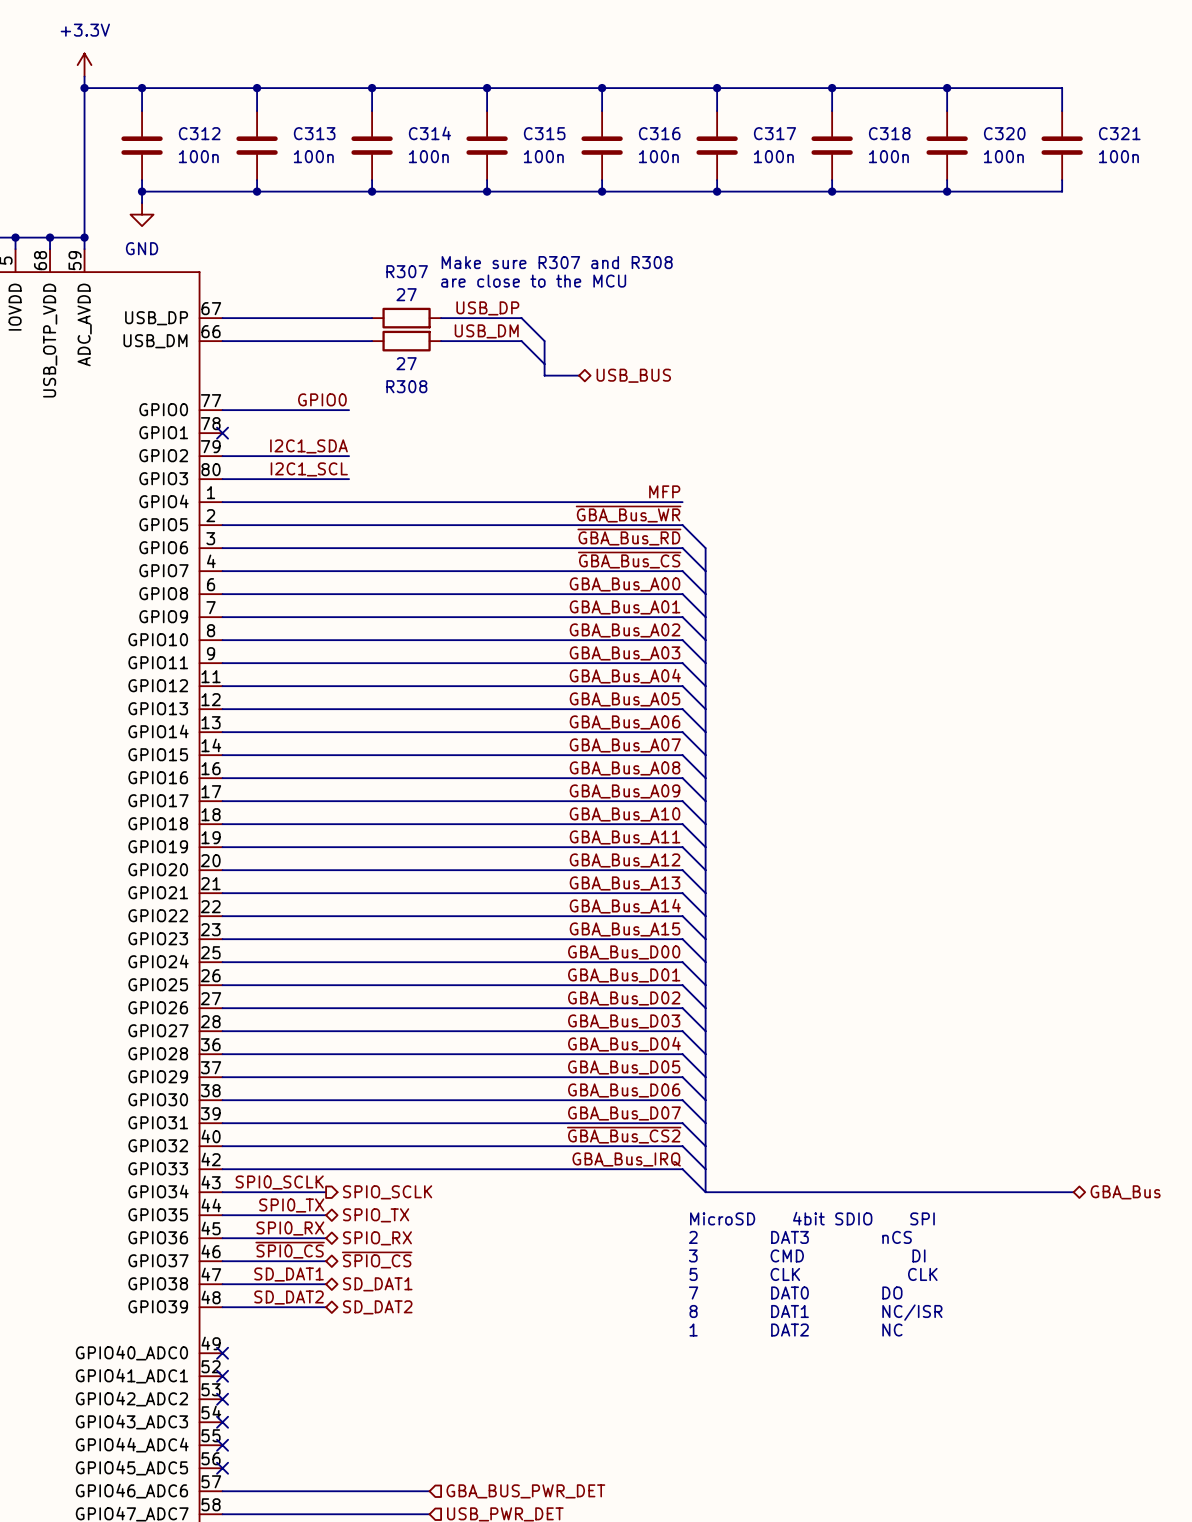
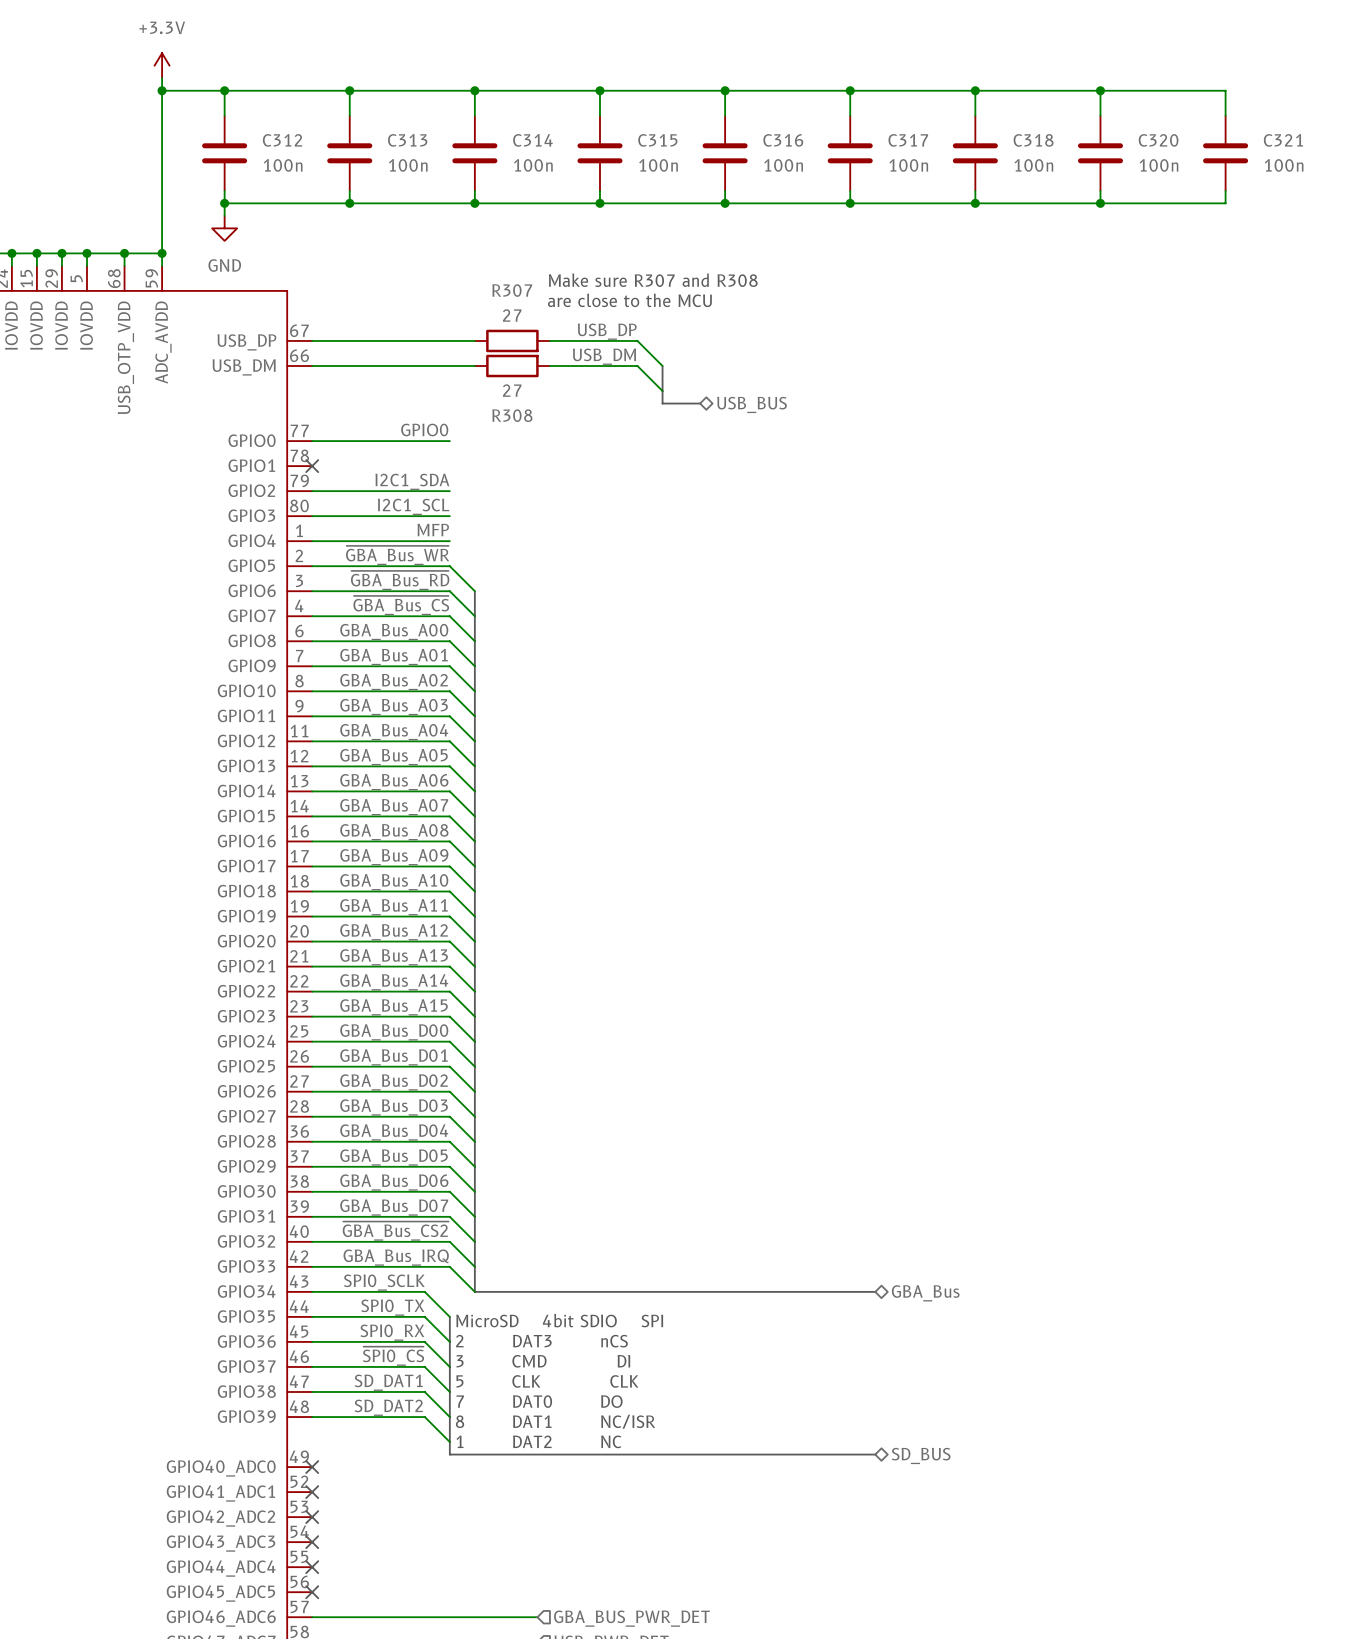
label: none -> MFP (433, 530)
label: MFP (664, 491) -> none
wire: (349, 502) (682, 502) -> none
label: none -> ~{GBA_Bus_WR} (397, 555)
label: ~{GBA_Bus_WR} (628, 514) -> none
wire: (349, 525) (682, 525) (705, 548) -> (449, 566) (474, 591)
label: none -> ~{GBA_Bus_RD} (400, 580)
label: ~{GBA_Bus_RD} (629, 537) -> none
wire: (349, 548) (682, 548) (705, 571) -> (449, 591) (474, 616)
bus: (705, 548) (705, 1192) -> (474, 591) (474, 1291) (837, 1291)
label: none -> ~{GBA_Bus_CS} (401, 605)
label: ~{GBA_Bus_CS} (629, 560) -> none
wire: (349, 571) (682, 571) (705, 594) -> (449, 616) (474, 641)
label: none -> GBA_Bus_A00 (394, 631)
label: GBA_Bus_A00 (625, 584) -> none
wire: (349, 594) (682, 594) (705, 617) -> (449, 641) (474, 666)
label: none -> GBA_Bus_A01 (394, 657)
label: GBA_Bus_A01 (625, 607) -> none
wire: (349, 617) (682, 617) (705, 640) -> (449, 666) (474, 691)
label: none -> GBA_Bus_A02 (394, 682)
label: GBA_Bus_A02 (625, 630) -> none
wire: (349, 640) (682, 640) (705, 663) -> (449, 691) (474, 716)
label: none -> GBA_Bus_A03 (394, 707)
label: GBA_Bus_A03 (625, 653) -> none
wire: (349, 663) (682, 663) (705, 686) -> (449, 716) (474, 741)
label: none -> GBA_Bus_A04 (394, 732)
label: GBA_Bus_A04 (625, 676) -> none
wire: (349, 686) (682, 686) (705, 709) -> (449, 741) (474, 766)
label: none -> GBA_Bus_A05 (394, 757)
label: GBA_Bus_A05 (625, 699) -> none
wire: (349, 709) (682, 709) (705, 732) -> (449, 766) (474, 791)
label: none -> GBA_Bus_A06 (394, 782)
label: GBA_Bus_A06 (625, 722) -> none
wire: (349, 732) (682, 732) (705, 755) -> (449, 791) (474, 816)
label: none -> GBA_Bus_A07 (394, 807)
label: GBA_Bus_A07 (625, 745) -> none
wire: (349, 755) (682, 755) (705, 778) -> (449, 816) (474, 841)
label: none -> GBA_Bus_A08 (394, 832)
label: GBA_Bus_A08 (625, 768) -> none
wire: (349, 778) (682, 778) (705, 801) -> (449, 841) (474, 866)
label: none -> GBA_Bus_A09 (394, 857)
label: GBA_Bus_A09 (625, 791) -> none
wire: (349, 801) (682, 801) (705, 824) -> (449, 866) (474, 891)
label: none -> GBA_Bus_A10 (394, 882)
label: GBA_Bus_A10 (625, 814) -> none
wire: (349, 824) (682, 824) (705, 847) -> (449, 891) (474, 916)
label: none -> GBA_Bus_A11 (394, 907)
label: GBA_Bus_A11 (625, 837) -> none
wire: (349, 847) (682, 847) (705, 870) -> (449, 916) (474, 941)
label: none -> GBA_Bus_A12 (394, 932)
label: GBA_Bus_A12 (625, 860) -> none
wire: (349, 870) (682, 870) (705, 893) -> (449, 941) (474, 966)
label: none -> GBA_Bus_A13 (394, 957)
label: GBA_Bus_A13 (625, 883) -> none
wire: (349, 893) (682, 893) (705, 916) -> (449, 966) (474, 991)
label: none -> GBA_Bus_A14 (394, 982)
label: GBA_Bus_A14 (625, 906) -> none
wire: (349, 916) (682, 916) (705, 939) -> (449, 991) (474, 1016)
label: none -> GBA_Bus_A15 (394, 1007)
label: GBA_Bus_A15 (625, 929) -> none
wire: (349, 939) (682, 939) (705, 962) -> (449, 1016) (474, 1041)
label: none -> GBA_Bus_D00 (394, 1032)
label: GBA_Bus_D00 (624, 952) -> none
wire: (349, 962) (682, 962) (705, 985) -> (449, 1041) (474, 1066)
label: none -> GBA_Bus_D01 (394, 1057)
label: GBA_Bus_D01 (624, 975) -> none
wire: (349, 985) (682, 985) (705, 1008) -> (449, 1066) (474, 1091)
label: none -> GBA_Bus_D02 (394, 1082)
label: GBA_Bus_D02 (624, 998) -> none
wire: (349, 1008) (682, 1008) (705, 1031) -> (449, 1091) (474, 1116)
label: none -> GBA_Bus_D03 (394, 1107)
label: GBA_Bus_D03 (624, 1021) -> none
wire: (349, 1031) (682, 1031) (705, 1054) -> (449, 1116) (474, 1141)
label: none -> GBA_Bus_D04 (394, 1132)
label: GBA_Bus_D04 (624, 1044) -> none
wire: (349, 1054) (682, 1054) (705, 1077) -> (449, 1141) (474, 1166)
label: none -> GBA_Bus_D05 (394, 1157)
label: GBA_Bus_D05 (624, 1067) -> none
wire: (349, 1077) (682, 1077) (705, 1100) -> (449, 1166) (474, 1191)
label: none -> GBA_Bus_D06 (394, 1182)
label: GBA_Bus_D06 (624, 1090) -> none
wire: (349, 1100) (682, 1100) (705, 1123) -> (449, 1191) (474, 1216)
label: none -> GBA_Bus_D07 (394, 1207)
label: GBA_Bus_D07 (624, 1113) -> none
wire: (349, 1123) (682, 1123) (705, 1146) -> (449, 1216) (474, 1241)
label: none -> ~{GBA_Bus_CS2} (395, 1231)
label: ~{GBA_Bus_CS2} (624, 1135) -> none
wire: (349, 1146) (682, 1146) (705, 1169) -> (449, 1241) (474, 1266)
label: none -> GBA_Bus_IRQ (396, 1257)
label: GBA_Bus_IRQ (626, 1159) -> none
wire: (349, 1169) (682, 1169) (705, 1192) -> (449, 1266) (474, 1291)
wire: none -> (424, 1291) (449, 1316)
hierarchical label: SPIO_SCLK (387, 1192) -> none
bus: (740, 1192) (1073, 1192) -> none
hierarchical label: none -> GBA_Bus (925, 1293)
hierarchical label: GBA_Bus (1125, 1192) -> none
wire: none -> (424, 1316) (449, 1341)
bus: none -> (449, 1316) (449, 1454) (875, 1454)
hierarchical label: SPIO_TX (376, 1215) -> none
text: none -> MicroSD 4bit SDIO SPI (559, 1320)
text: MicroSD 4bit SDIO SPI (812, 1218) -> none
text: none -> 2 DAT3 nCS (541, 1341)
text: 2 DAT3 nCS (800, 1237) -> none
wire: none -> (424, 1341) (449, 1366)
hierarchical label: SPIO_RX (377, 1238) -> none
text: none -> 3 CMD DI (543, 1361)
text: 3 CMD DI (807, 1255) -> none
hierarchical label: ~{SPIO_CS} (377, 1260) -> none
wire: none -> (424, 1366) (449, 1391)
text: none -> 5 CLK CLK (547, 1381)
text: 5 CLK CLK (813, 1274) -> none
wire: none -> (424, 1391) (449, 1417)
hierarchical label: SD_DAT1 (377, 1284) -> none
text: none -> 7 DAT0 DO (539, 1401)
text: 7 DAT0 DO (795, 1292) -> none
wire: none -> (424, 1417) (449, 1442)
hierarchical label: SD_DAT2 (377, 1307) -> none
text: none -> 8 DAT1 NC/ISR (555, 1421)
text: 8 DAT1 NC/ISR (816, 1312) -> none
text: none -> 1 DAT2 NC (538, 1441)
text: 1 DAT2 NC (796, 1330) -> none
hierarchical label: none -> SD_BUS (921, 1455)

